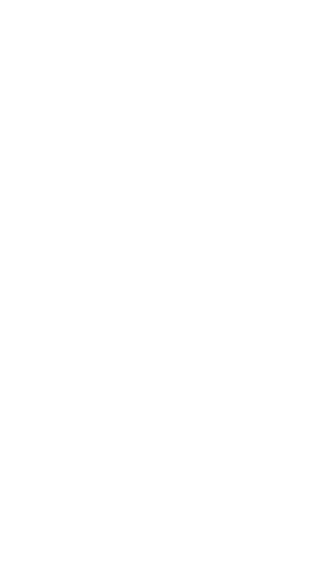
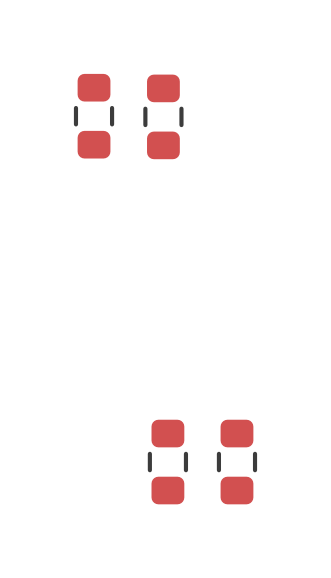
part: none -> (94, 116)
part: none -> (163, 116)
part: none -> (167, 462)
part: none -> (236, 462)

